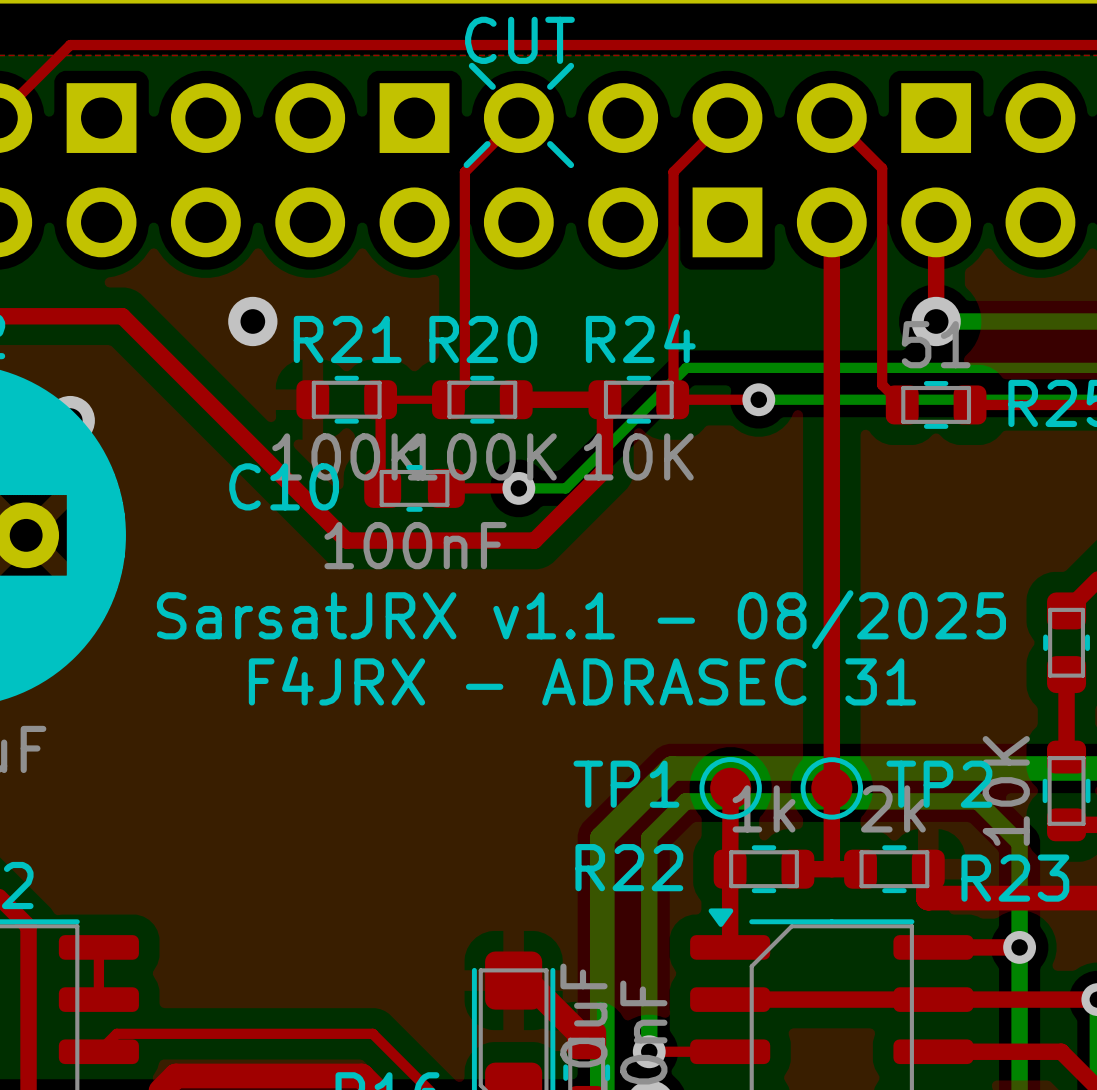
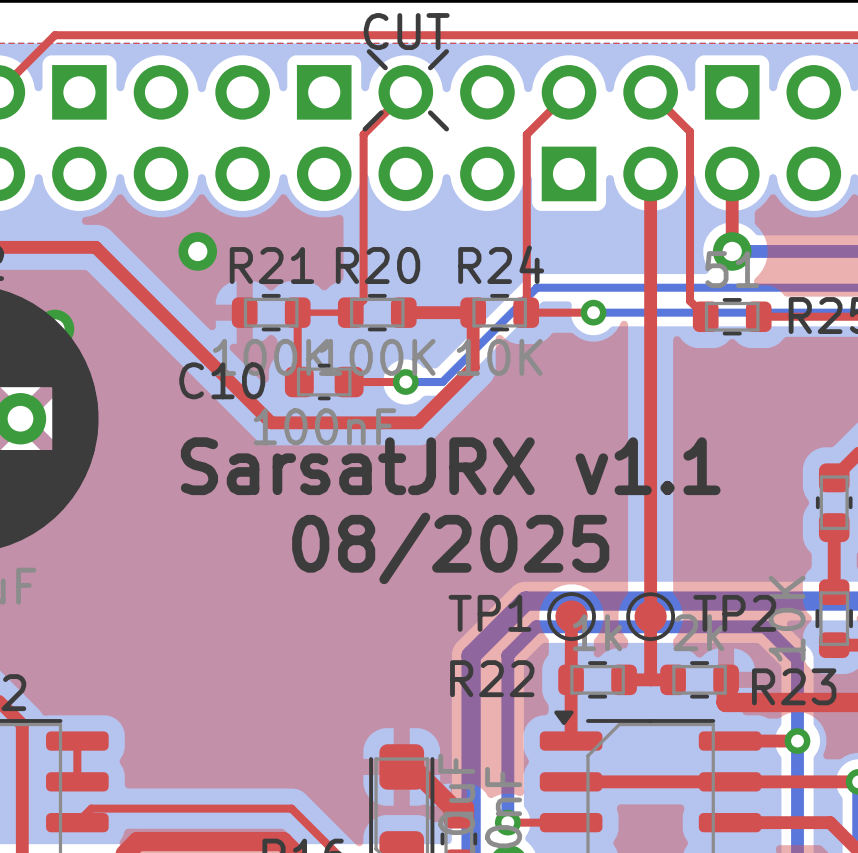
text: SarsatJRX v1.1 - 08/2025 (581, 619) -> SarsatJRX v1.1 (450, 466)
text: F4JRX - ADRASEC 31 (582, 680) -> 08/2025 (450, 548)

